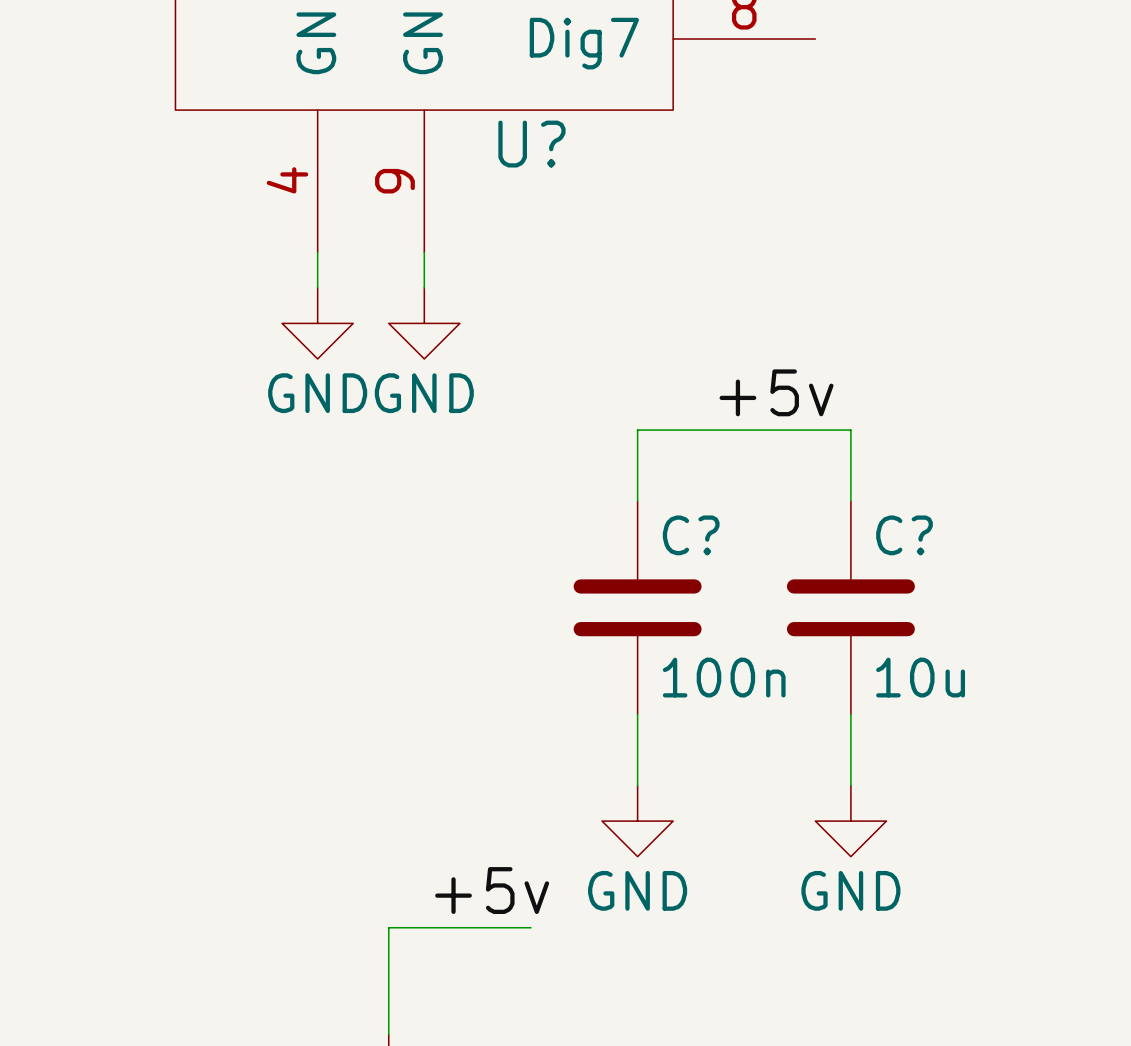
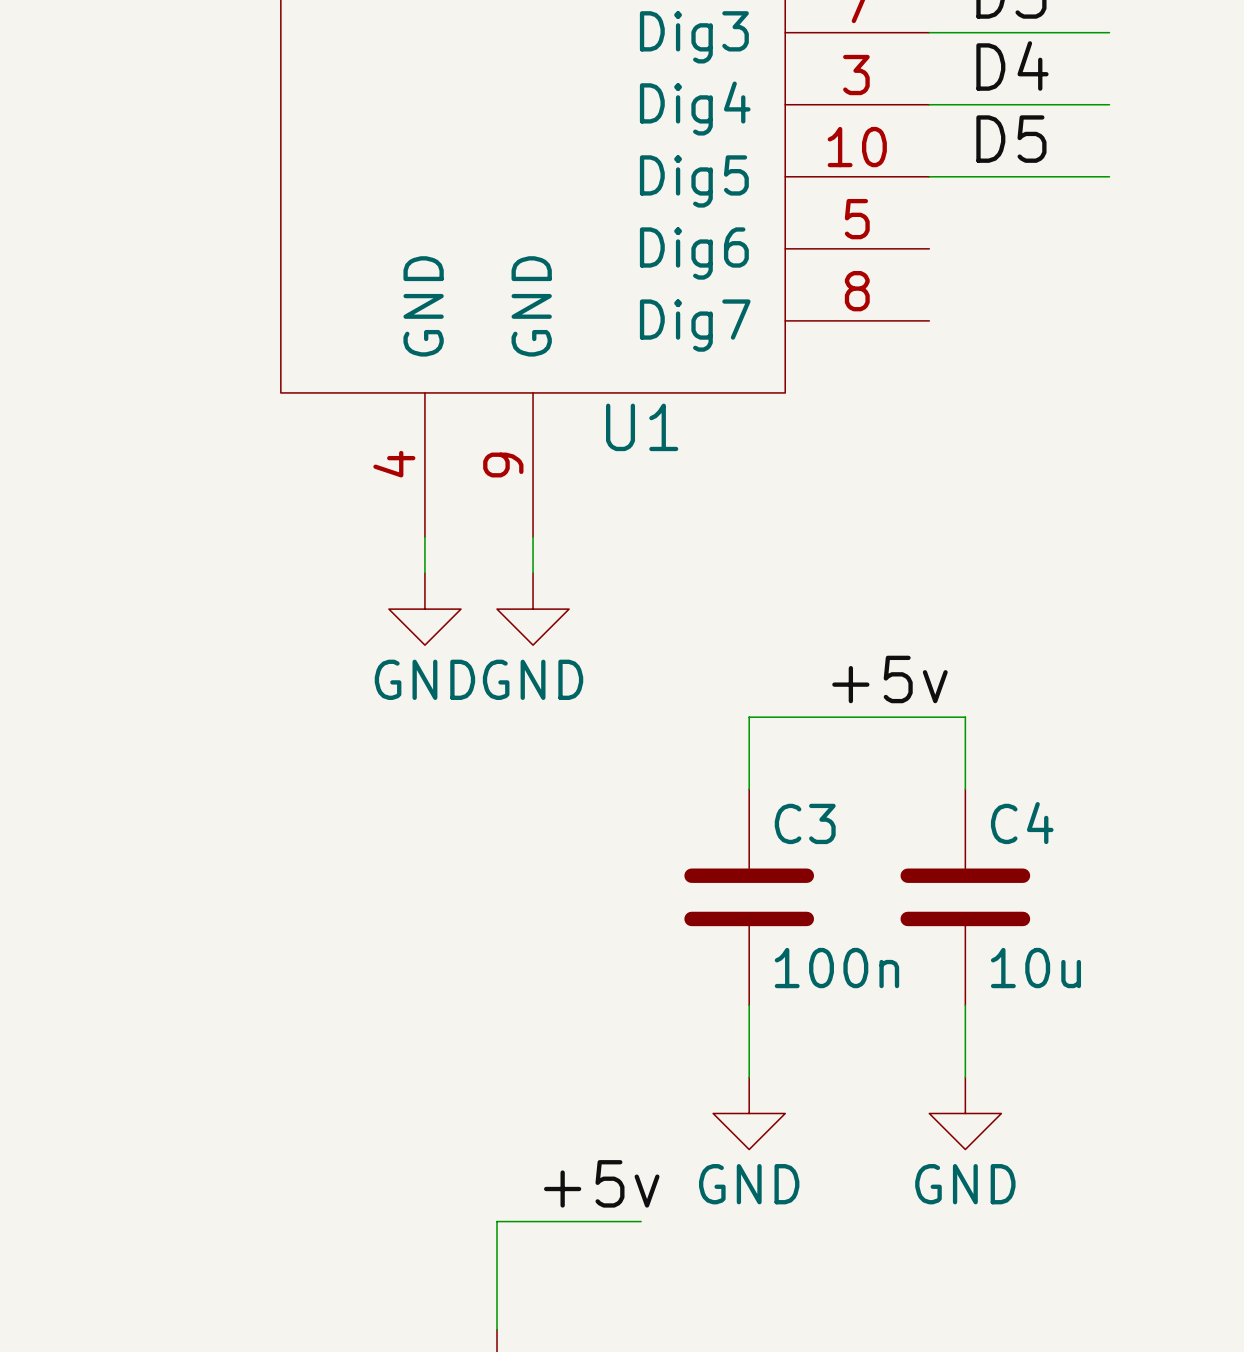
U? name: U? (531, 144) -> U1 (642, 427)
C? name: C? (691, 535) -> C3 (805, 823)
C? name: C? (904, 535) -> C4 (1022, 823)

